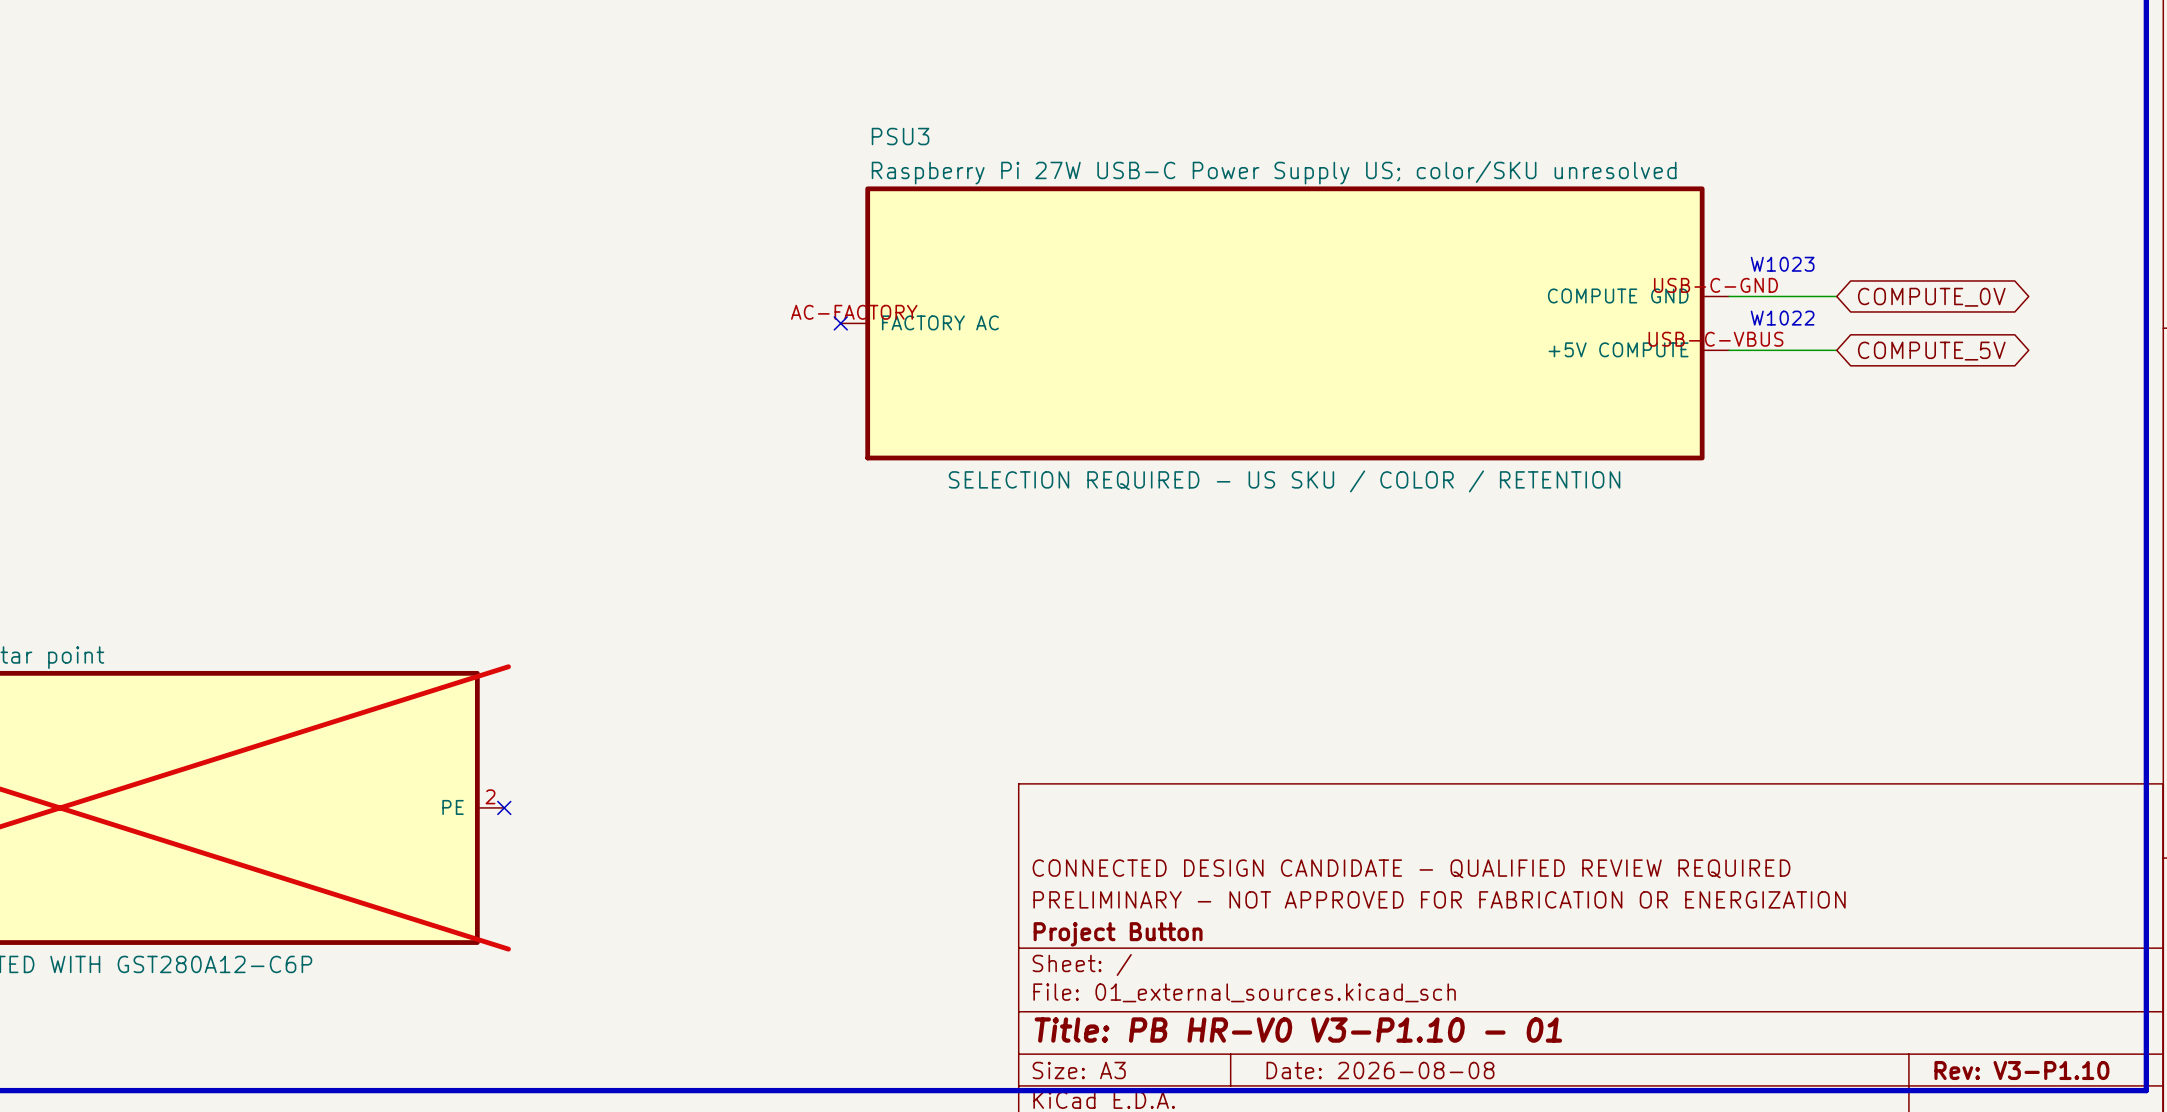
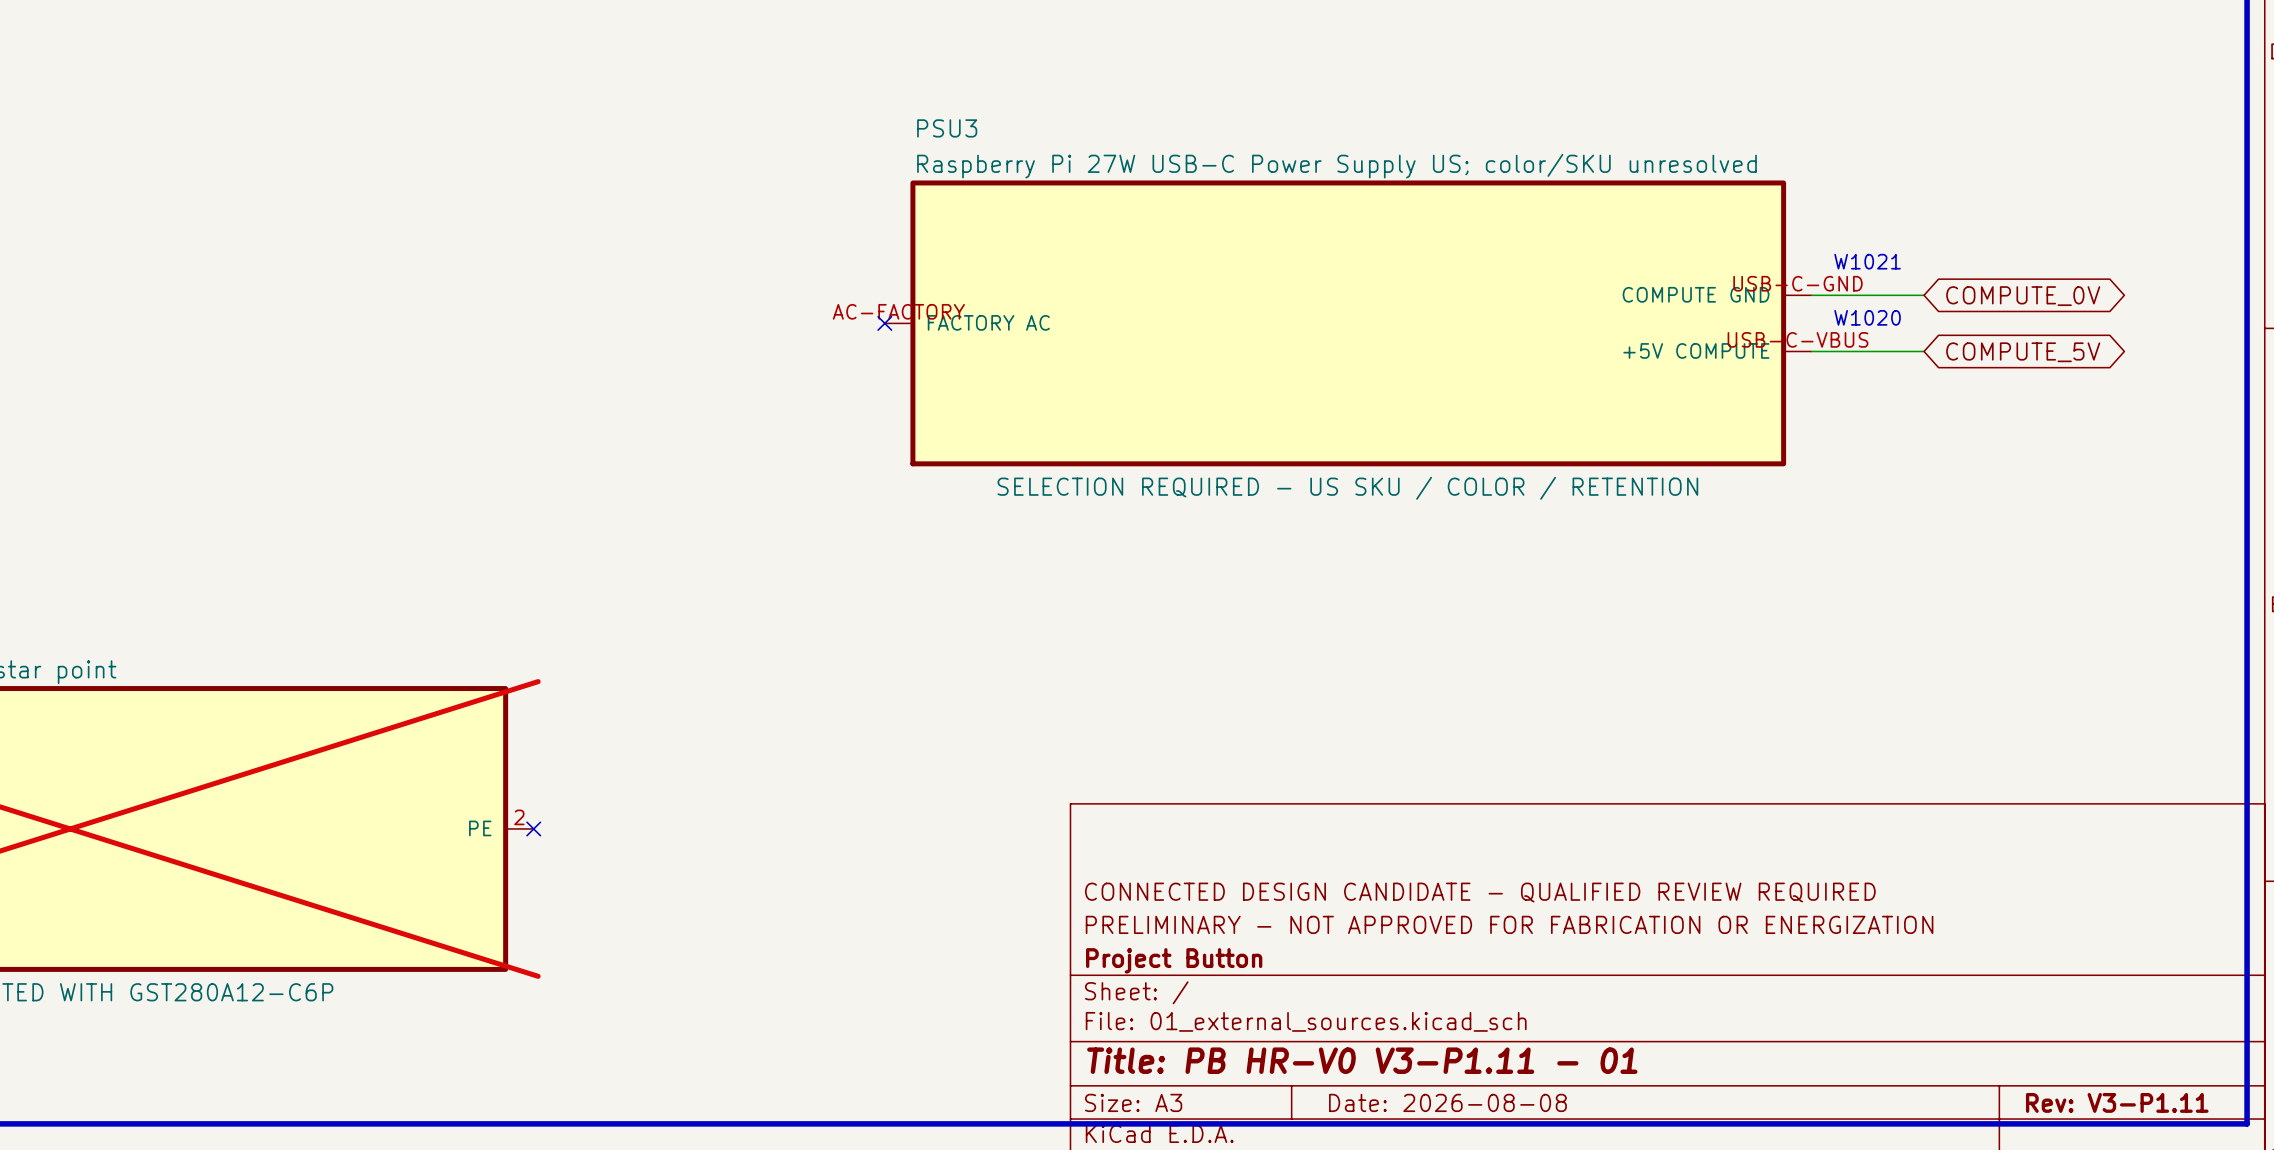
text: W1023 (1782, 264) -> W1021 (1867, 261)
text: W1022 (1782, 318) -> W1020 (1867, 317)
title block: Title: PB HR-V0 V3-P1.10 - 01 (1298, 1030) -> Title: PB HR-V0 V3-P1.11 - 01 (1362, 1060)
title block: Rev: V3-P1.10 (2021, 1070) -> Rev: V3-P1.11 (2117, 1102)

